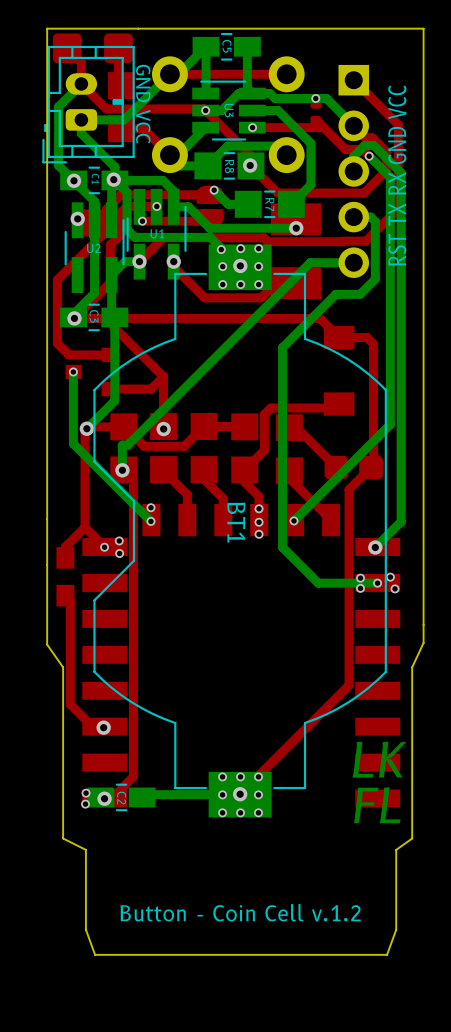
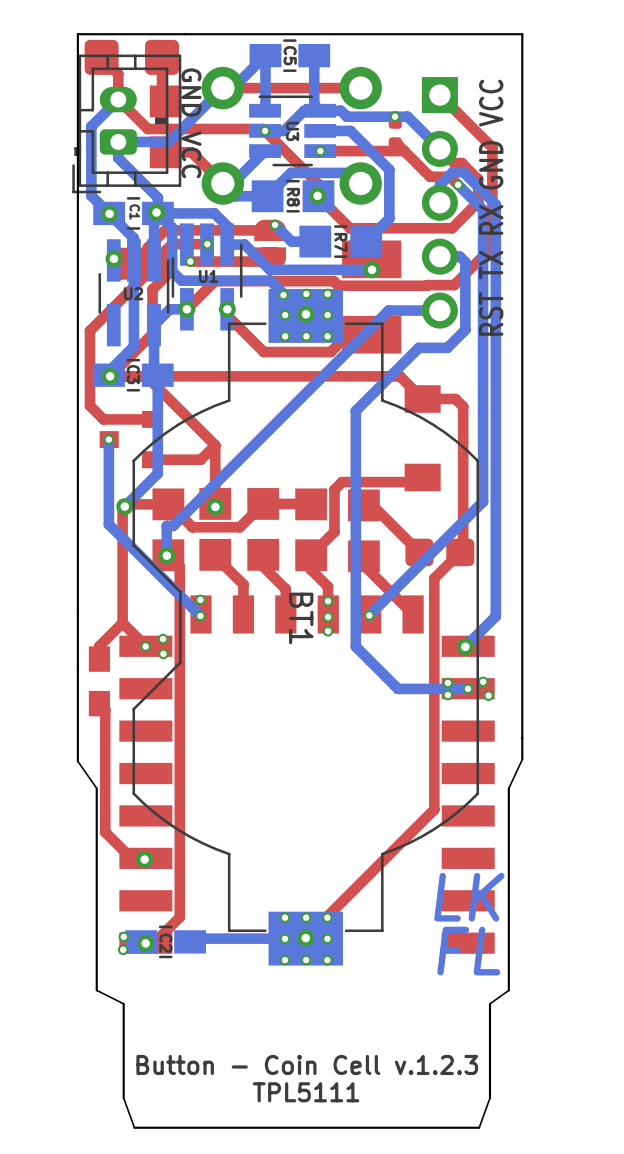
text: Button - Coin Cell v.1.2 (240, 912) -> Button - Coin Cell v.1.2.3 (307, 1064)
text: none -> TPL5111 (306, 1092)

